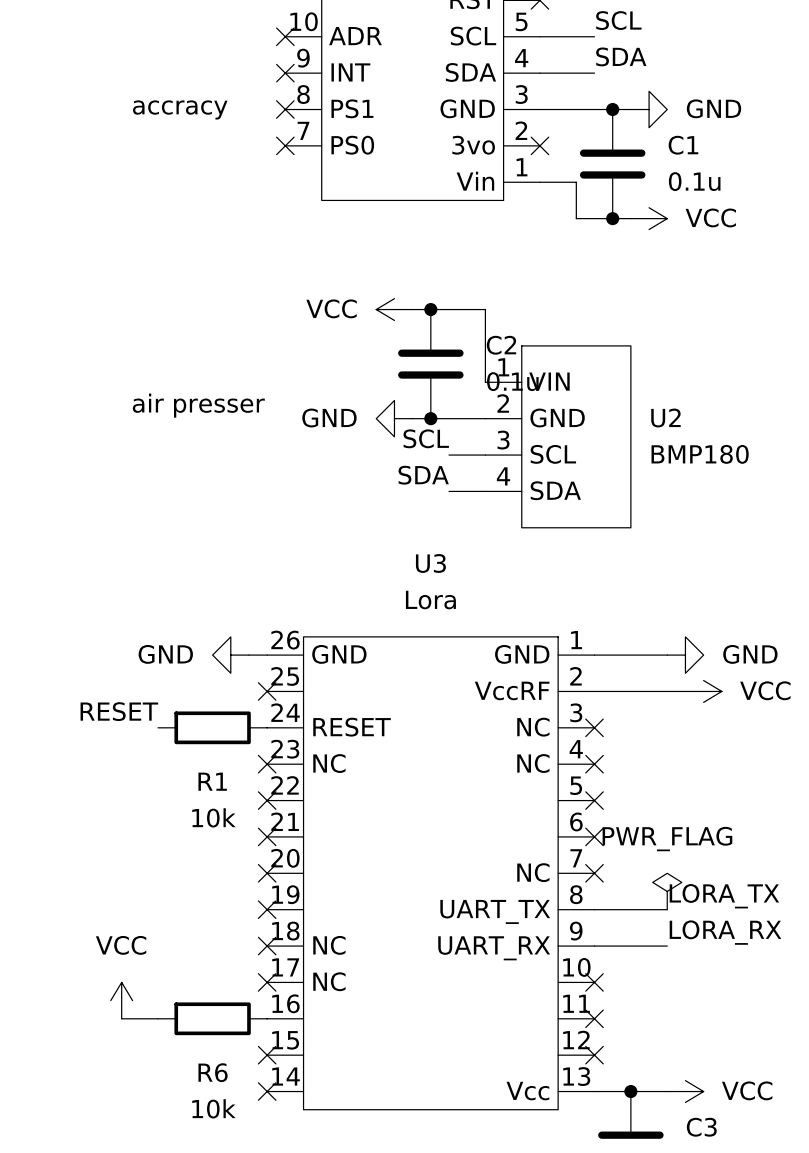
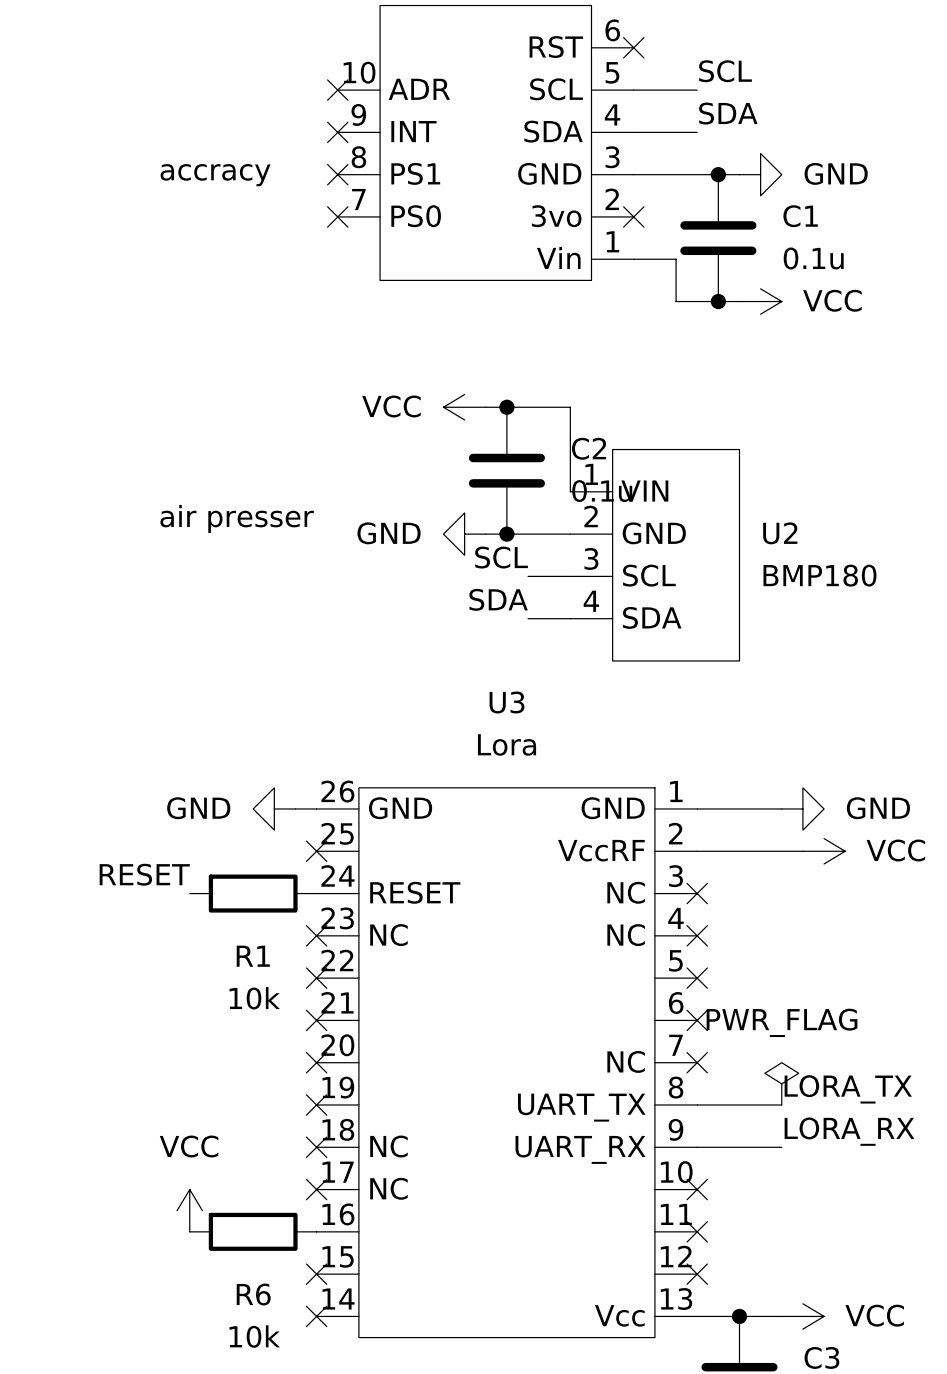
power symbol position: VCC (121, 1000) -> VCC (189, 1210)
wire: (121, 1018) (158, 1018) -> none

